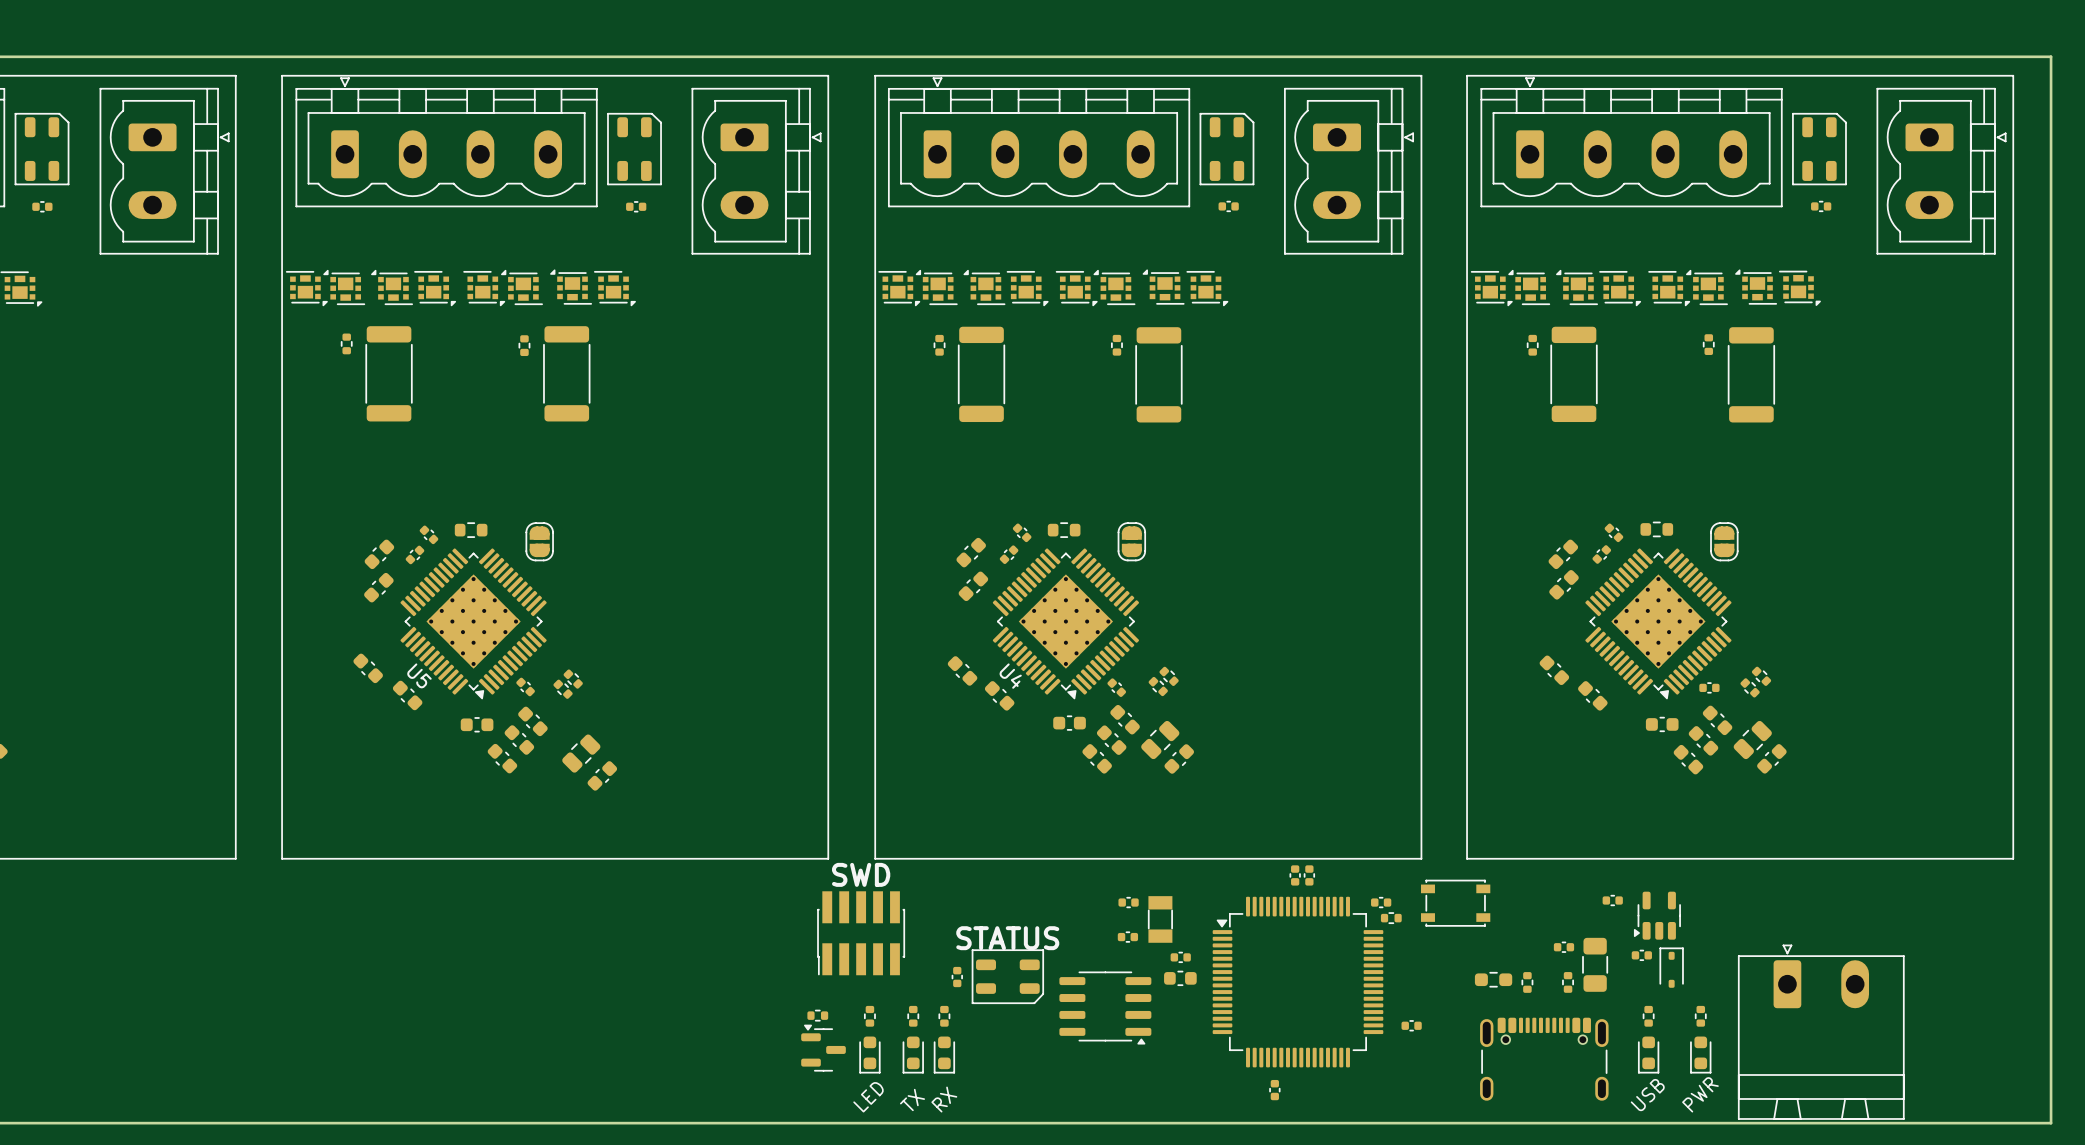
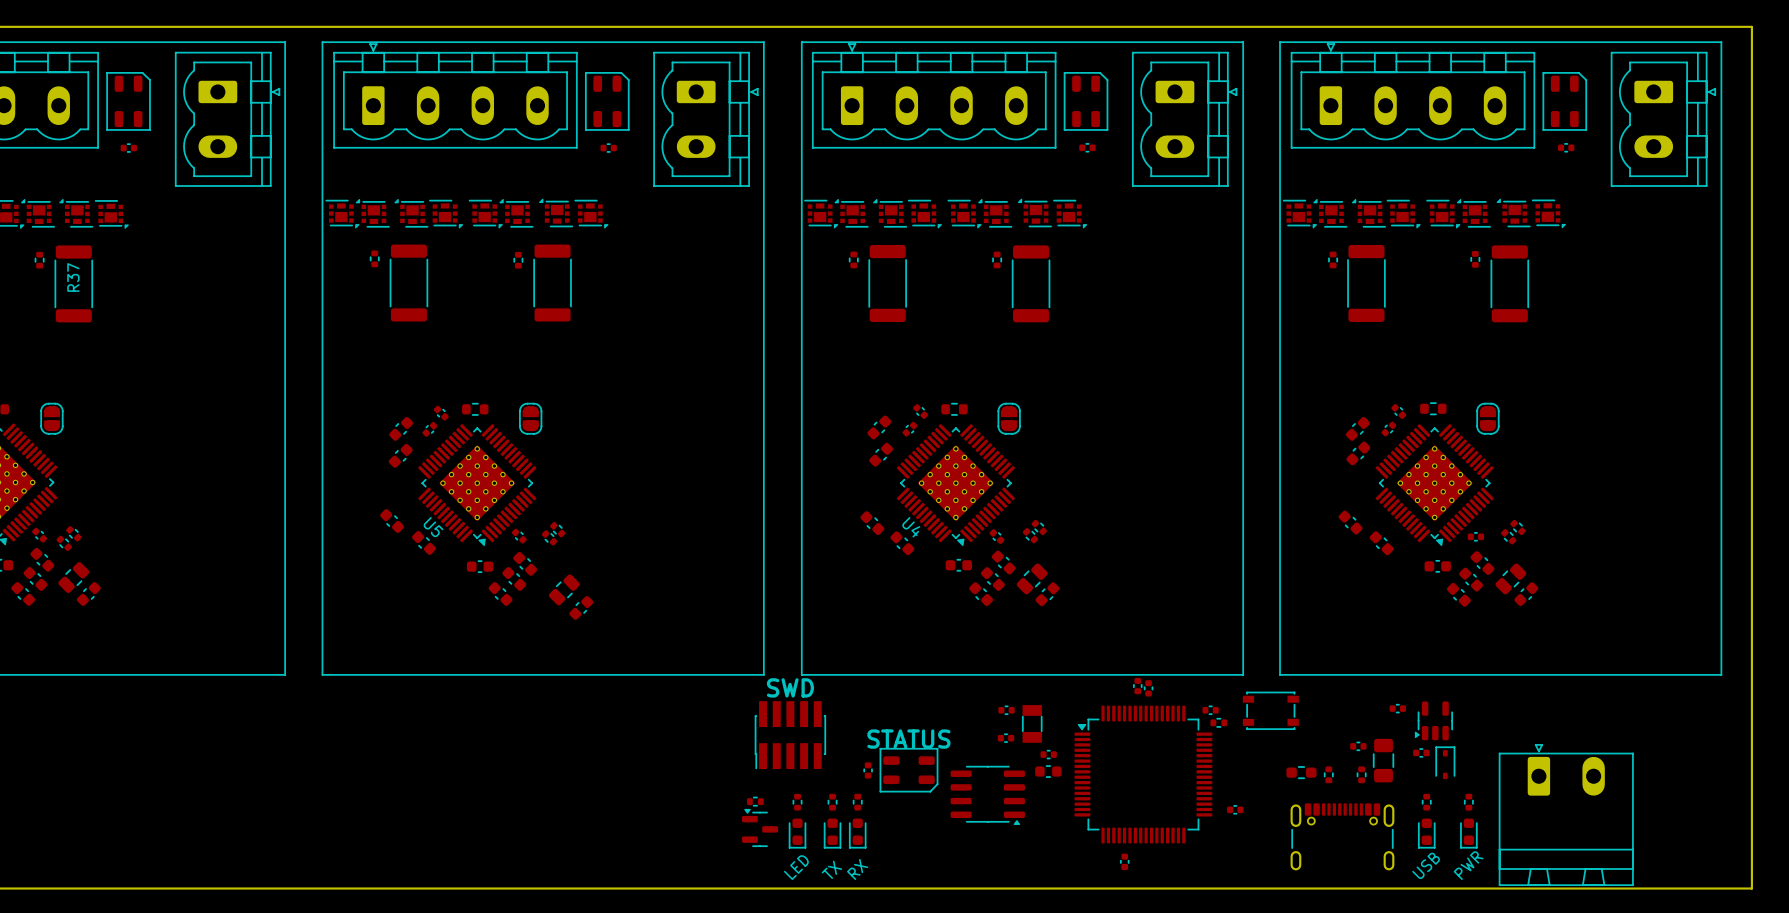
part: none -> (1137, 686)
part: (1295, 875) -> none
part: none -> (1148, 688)
part: (1309, 875) -> none

